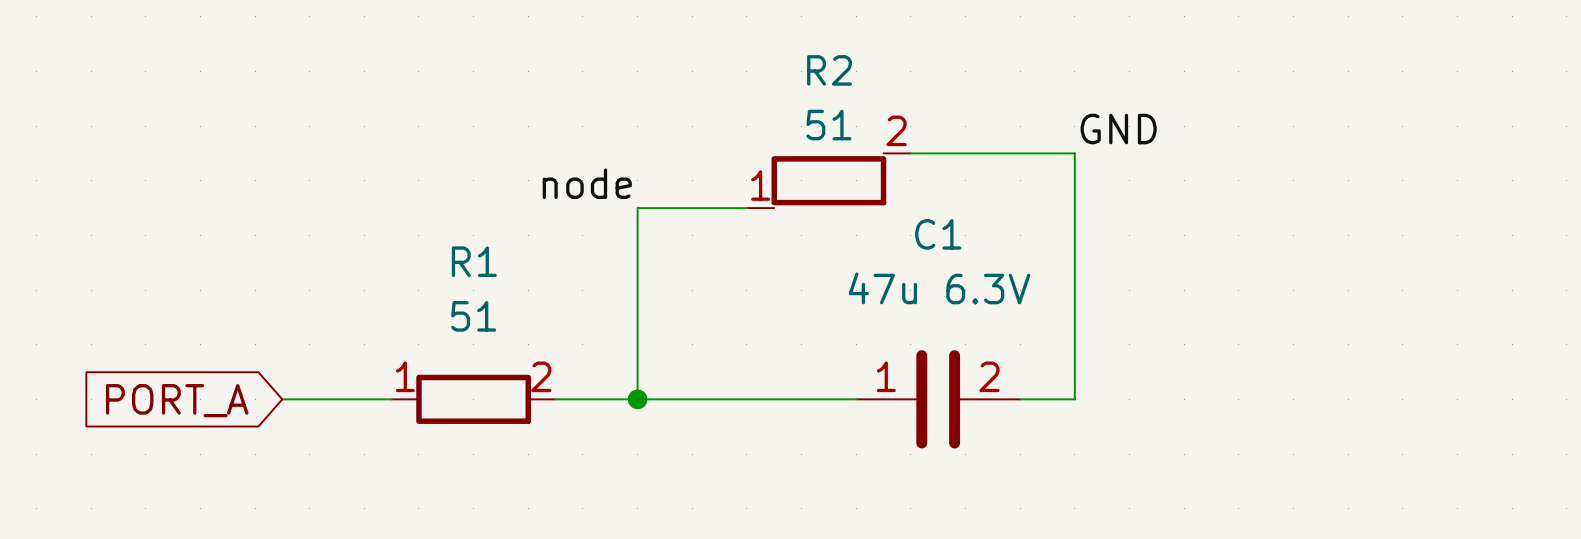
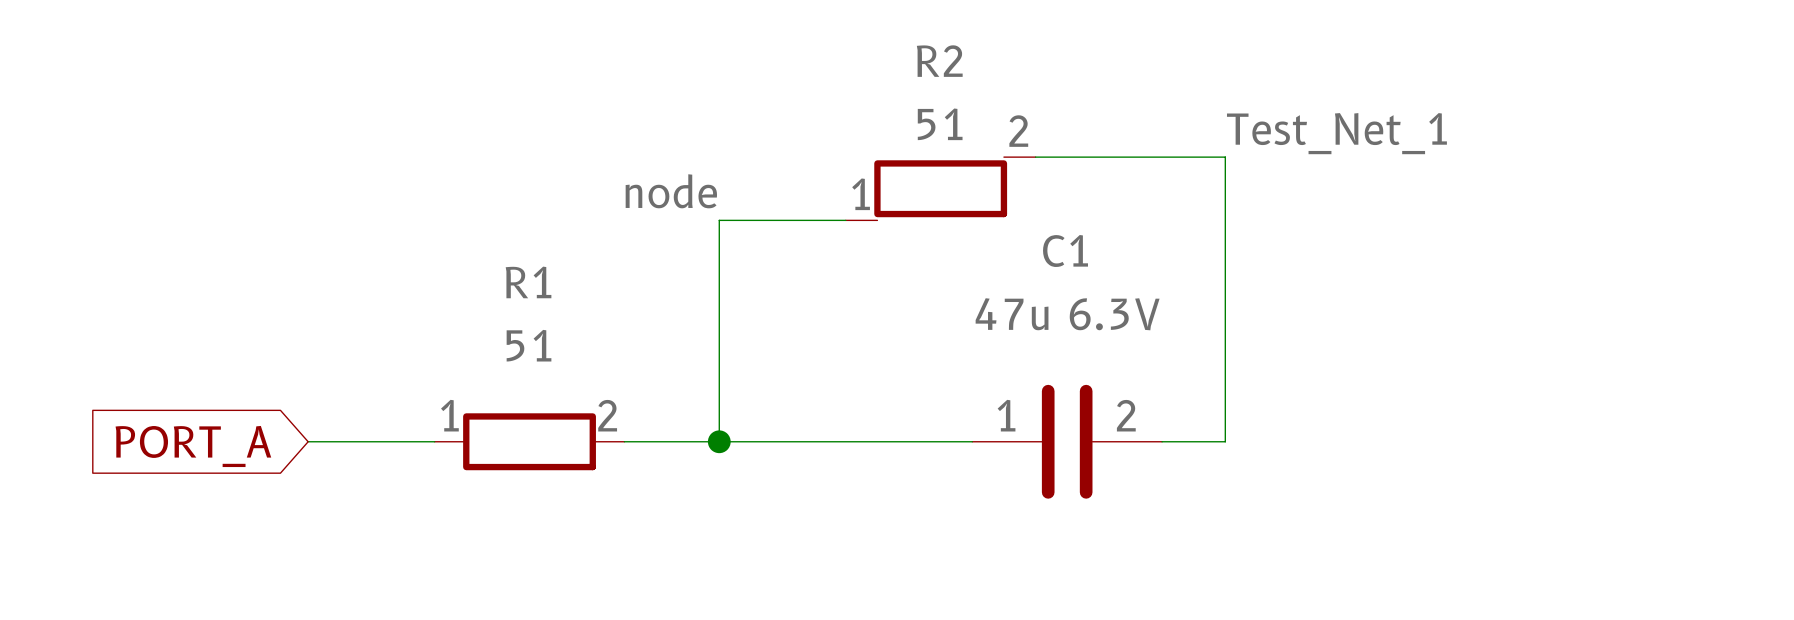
label: GND (1118, 129) -> Test_Net_1 (1336, 133)

